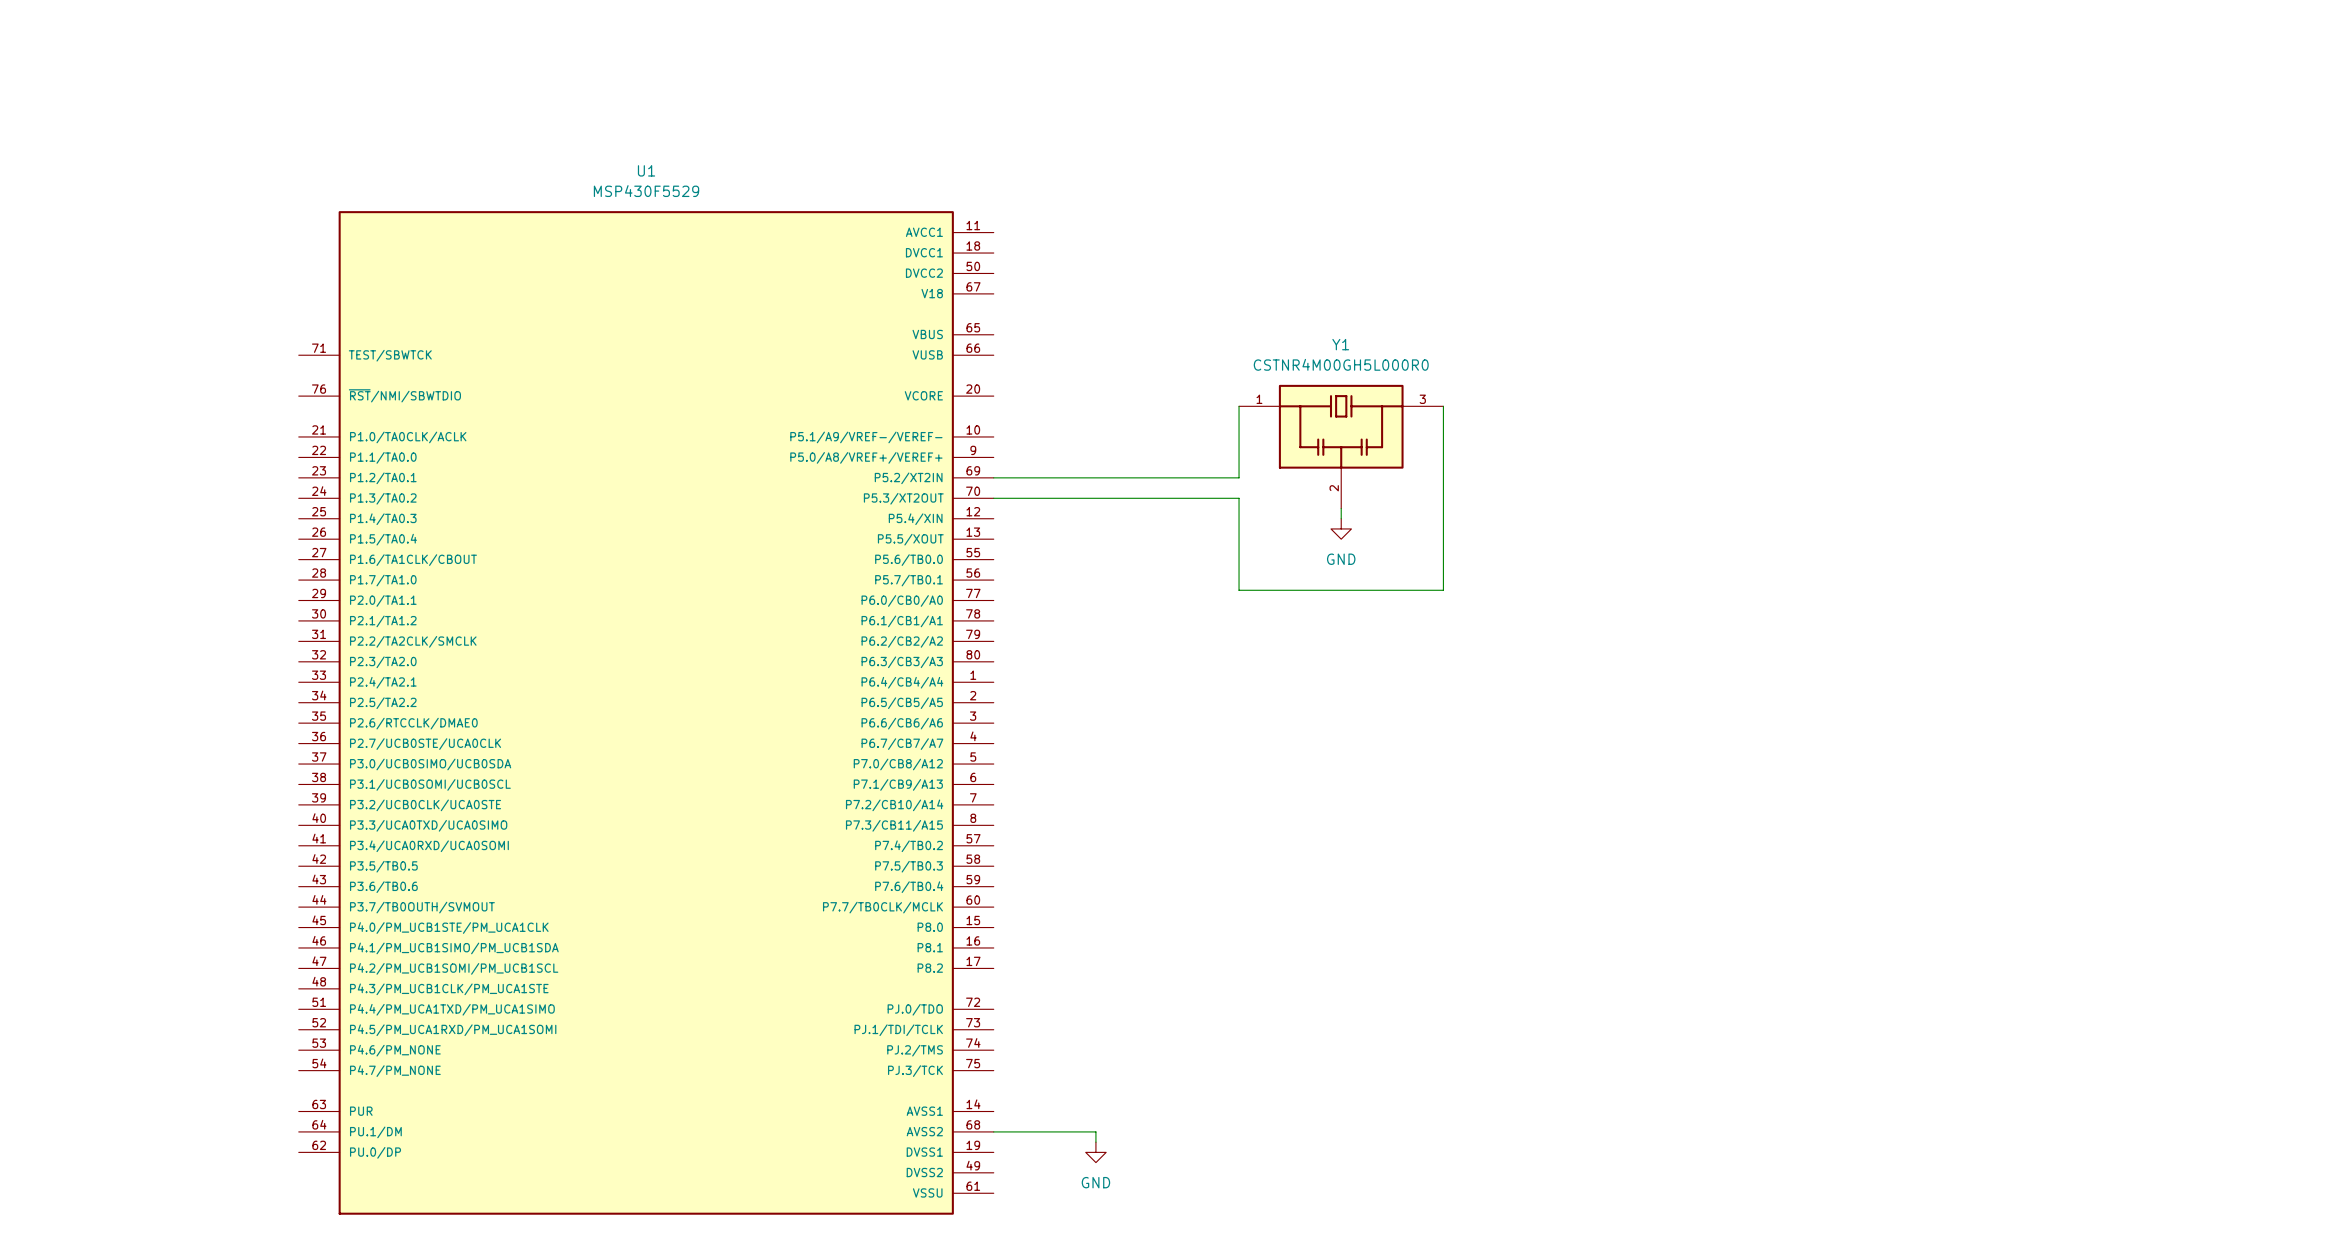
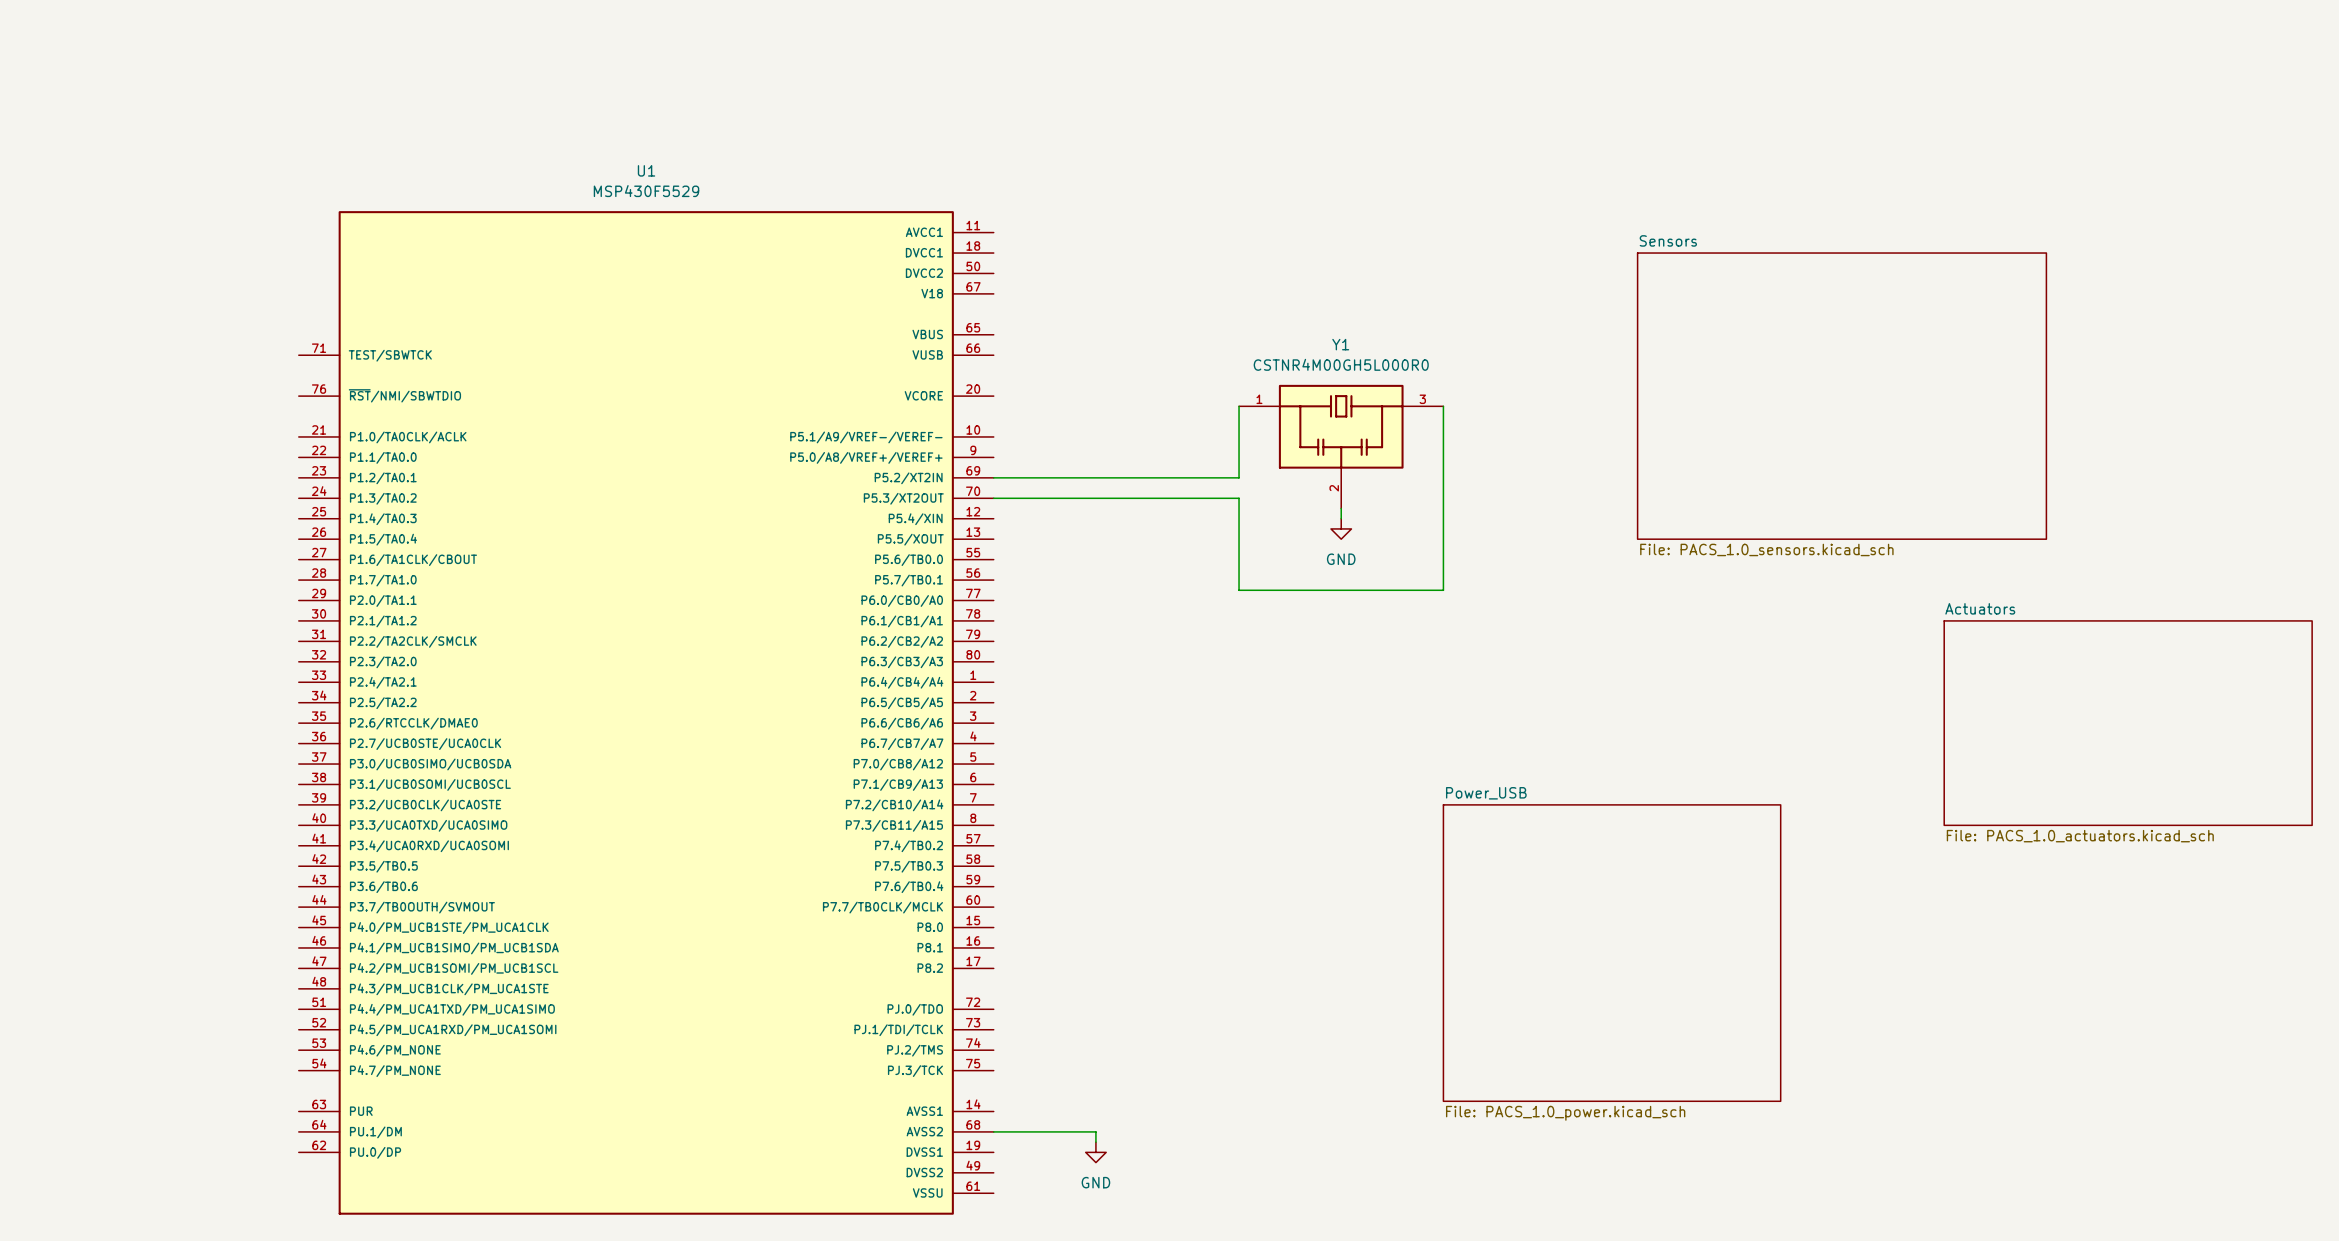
sheet Sensors: none -> File: PACS_1.0_sensors.kicad_sch (1842, 396)
sheet Actuators: none -> File: PACS_1.0_actuators.kicad_sch (2128, 723)
sheet Power_USB: none -> File: PACS_1.0_power.kicad_sch (1612, 953)

